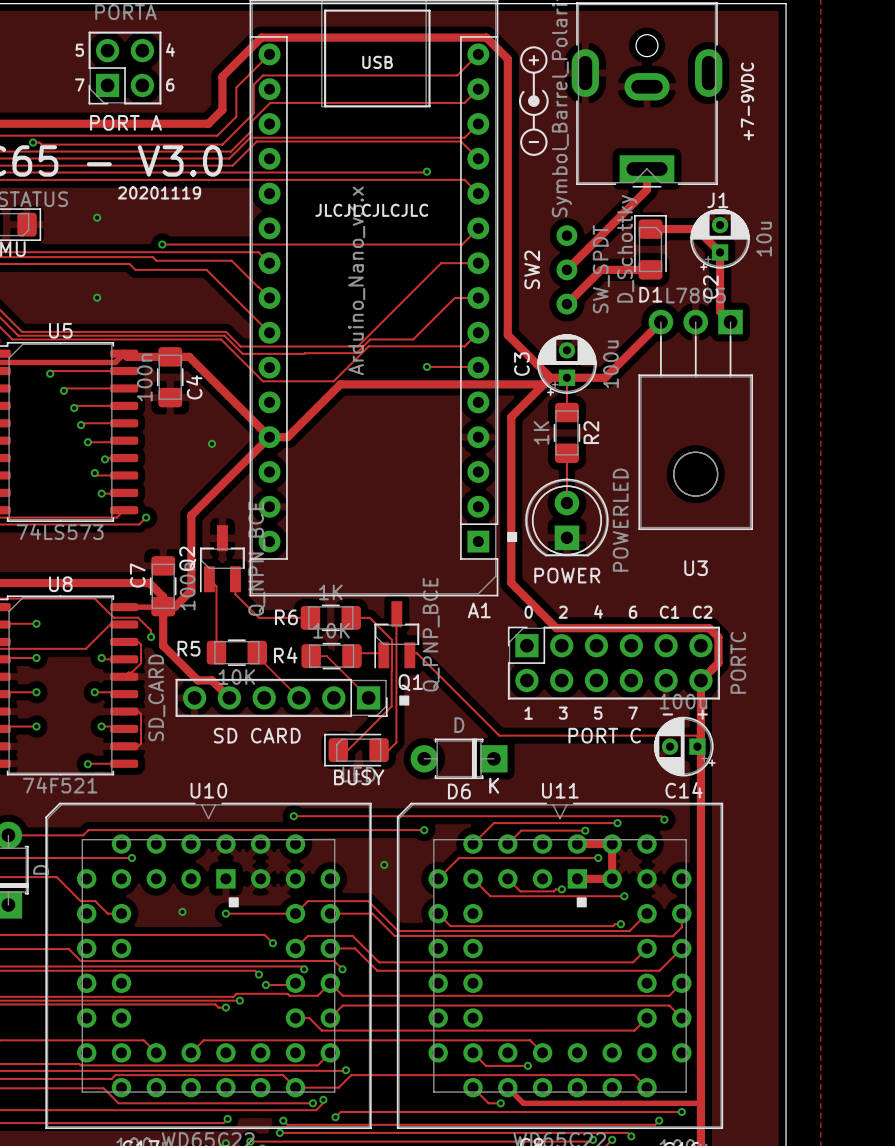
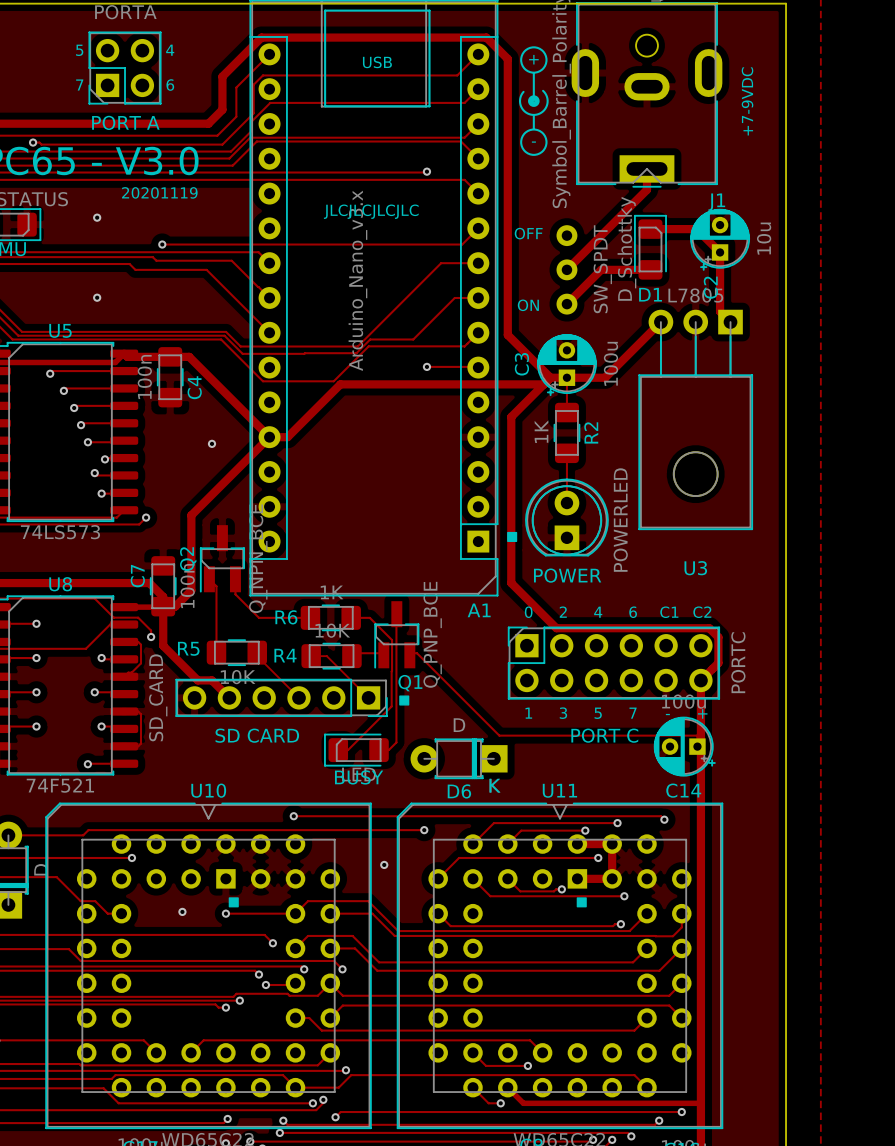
text: none -> OFF (528, 233)
SW2 name: SW2 (532, 269) -> none
text: none -> ON (528, 305)

